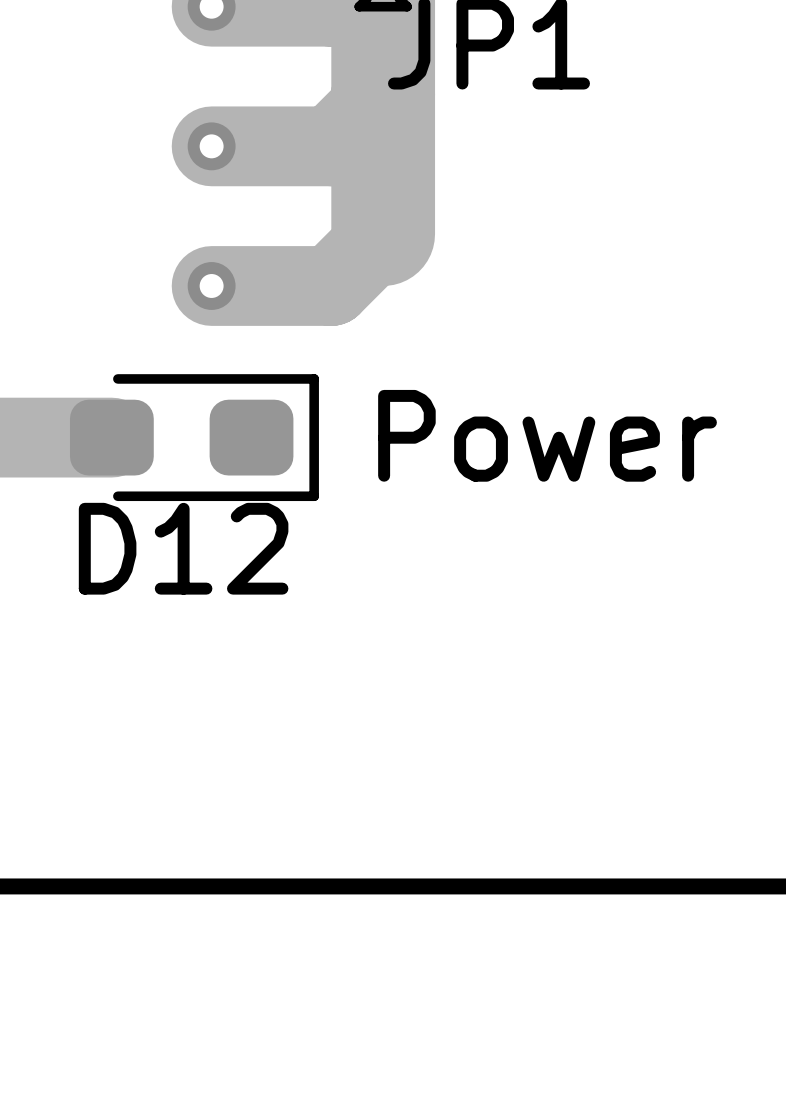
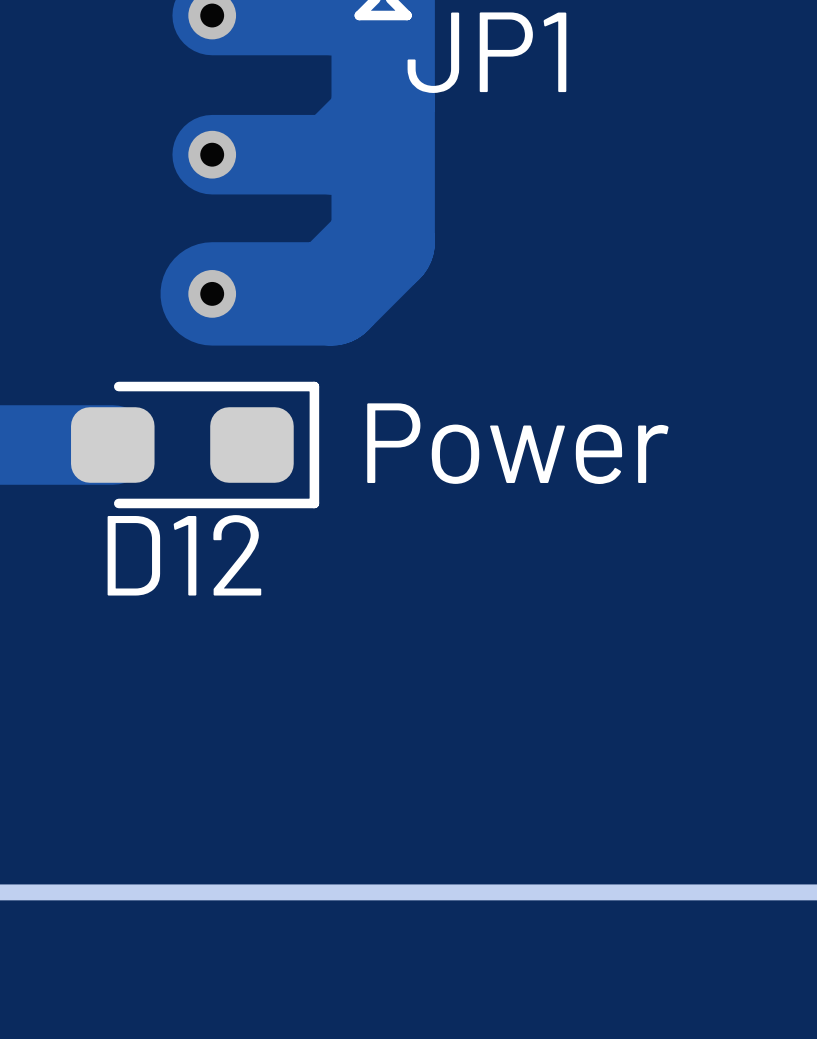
track width: thin (383, 234) (331, 285) (211, 285) -> thick (383, 242) (331, 293) (212, 293)

